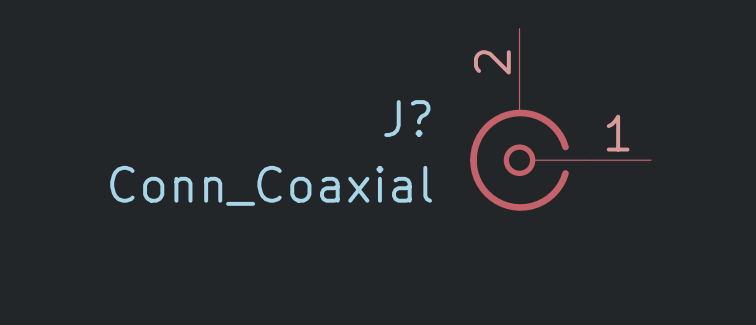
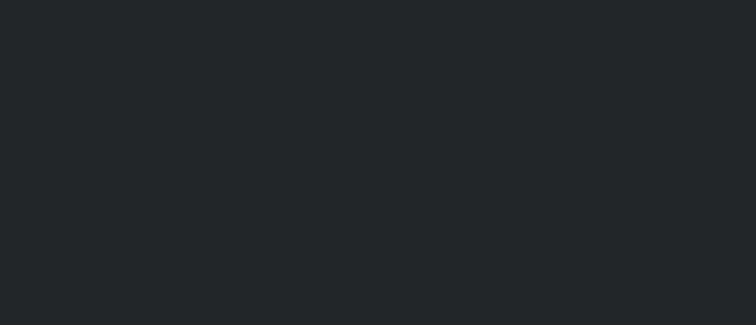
J?: Conn_Coaxial (560, 119) -> none

